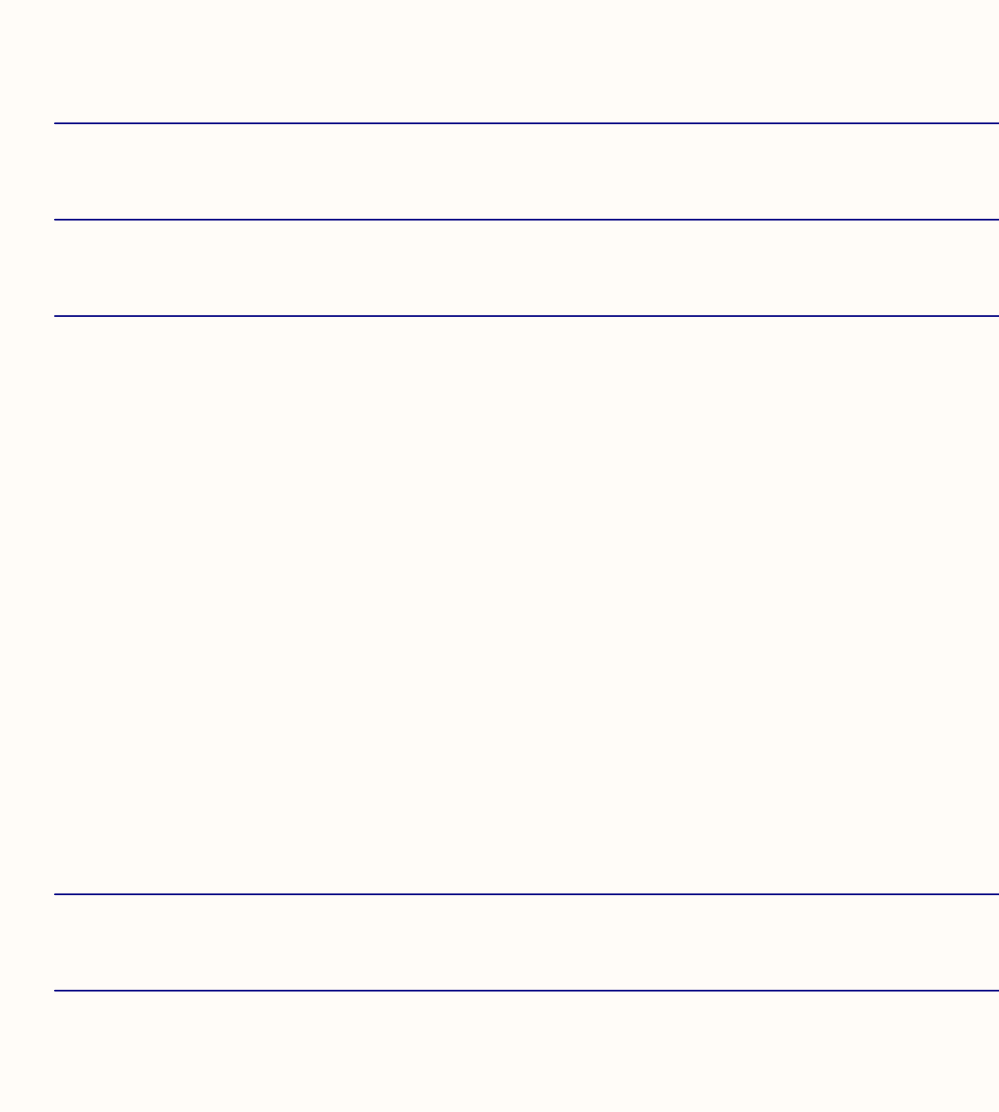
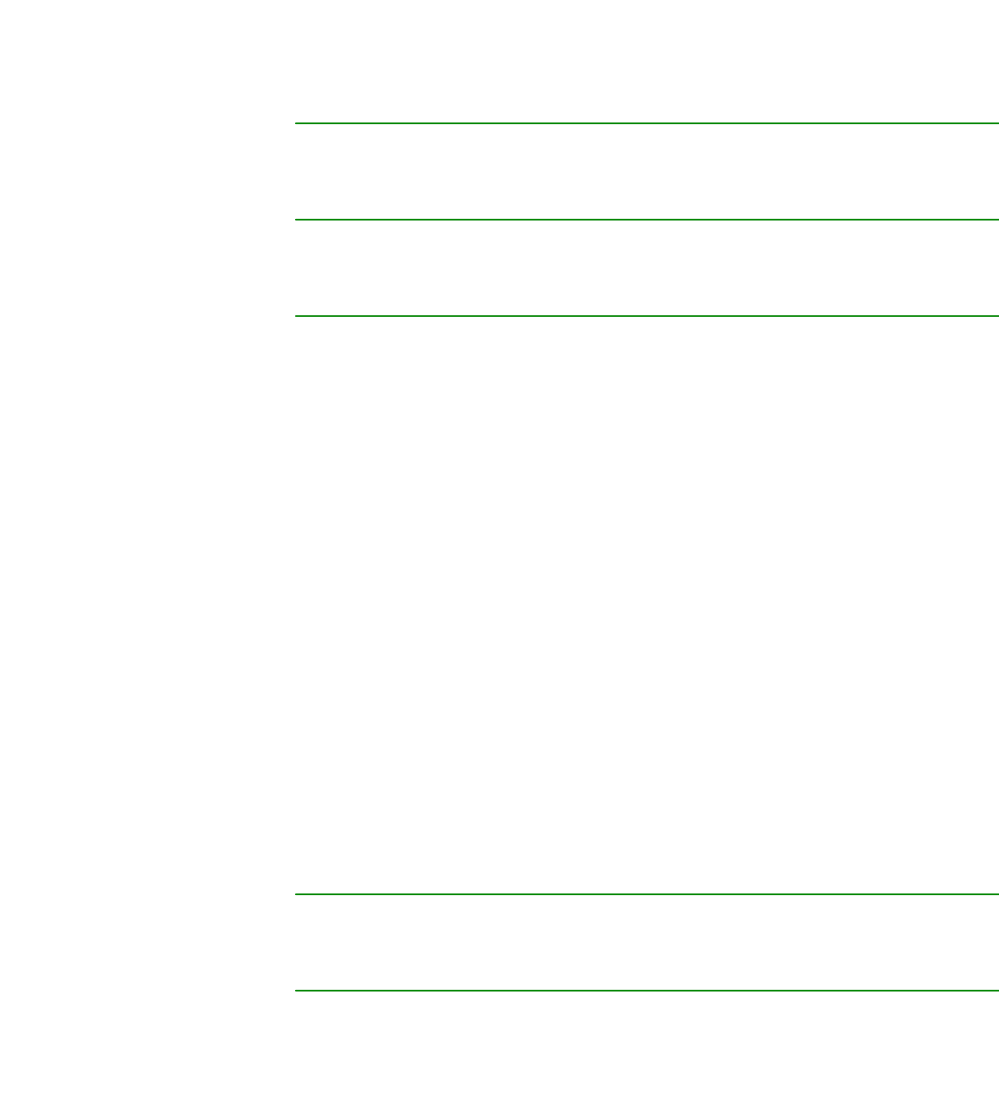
wire: (54, 123) (295, 123) -> none
wire: (54, 219) (295, 219) -> none
wire: (54, 316) (295, 316) -> none
wire: (54, 894) (295, 894) -> none
wire: (54, 990) (295, 990) -> none

